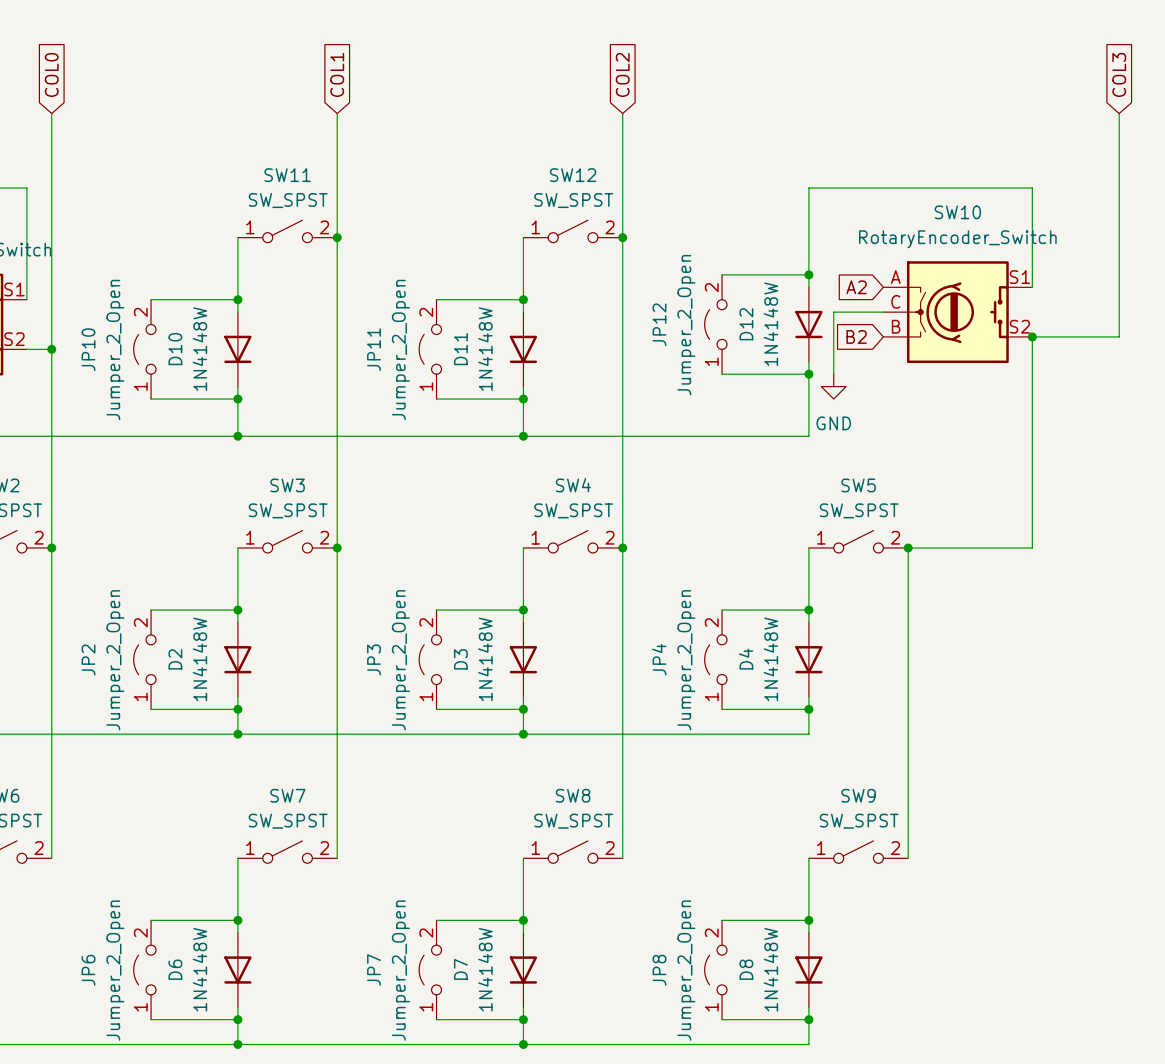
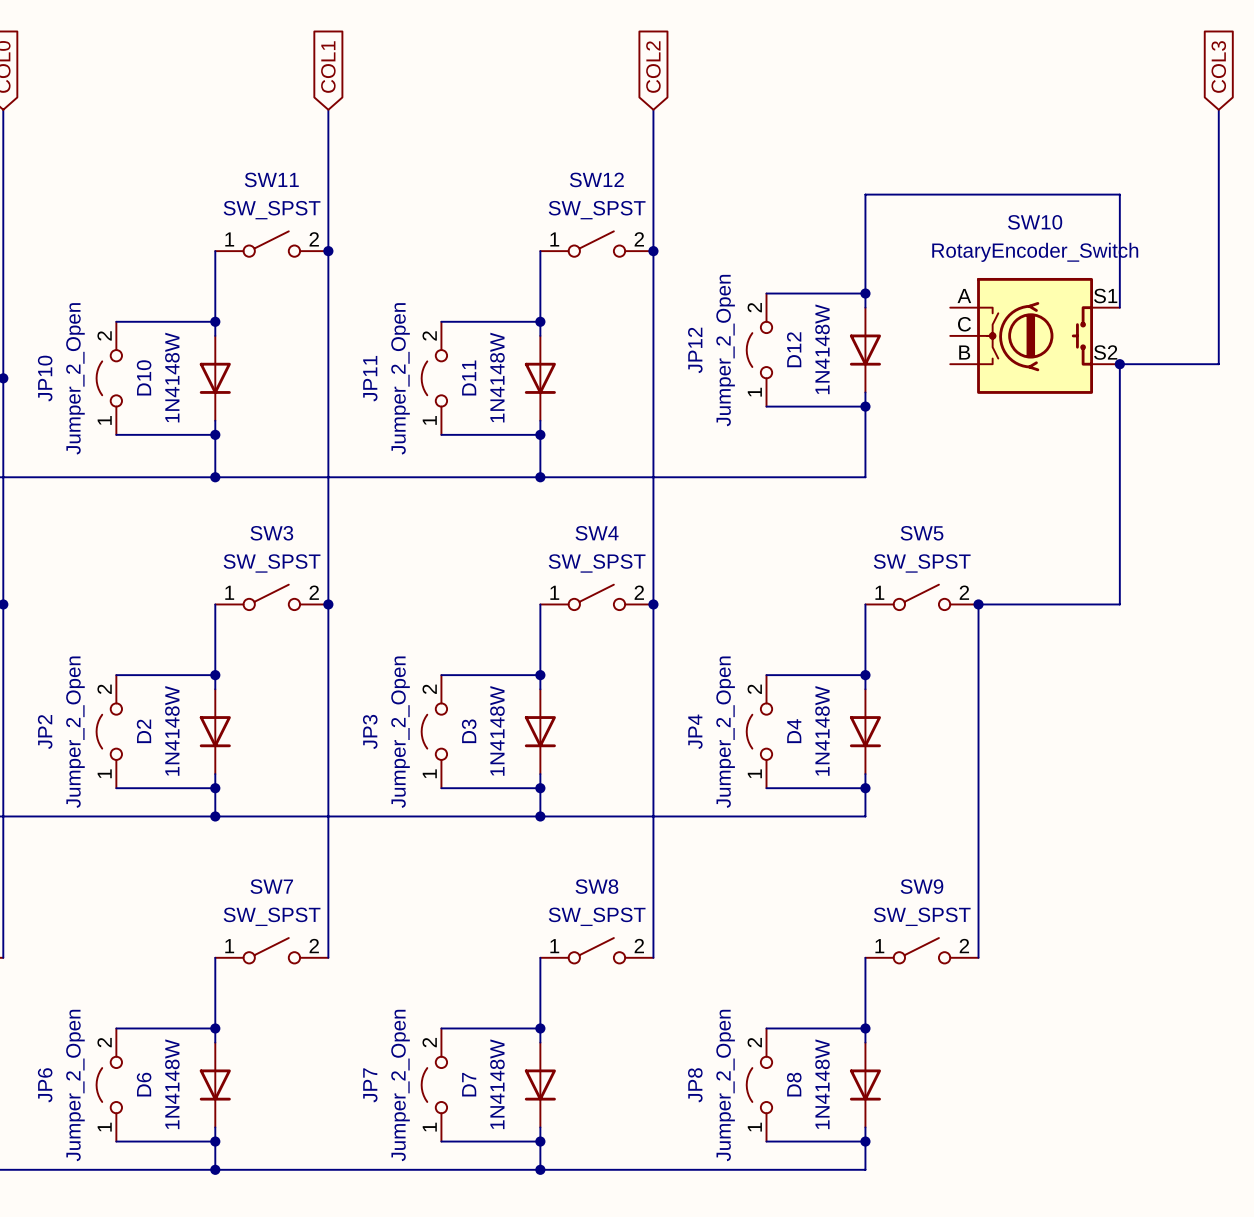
global label: A2 (856, 287) -> none
wire: (883, 312) (833, 312) (833, 374) -> none
global label: B2 (856, 336) -> none
power symbol: GND (833, 386) -> none

